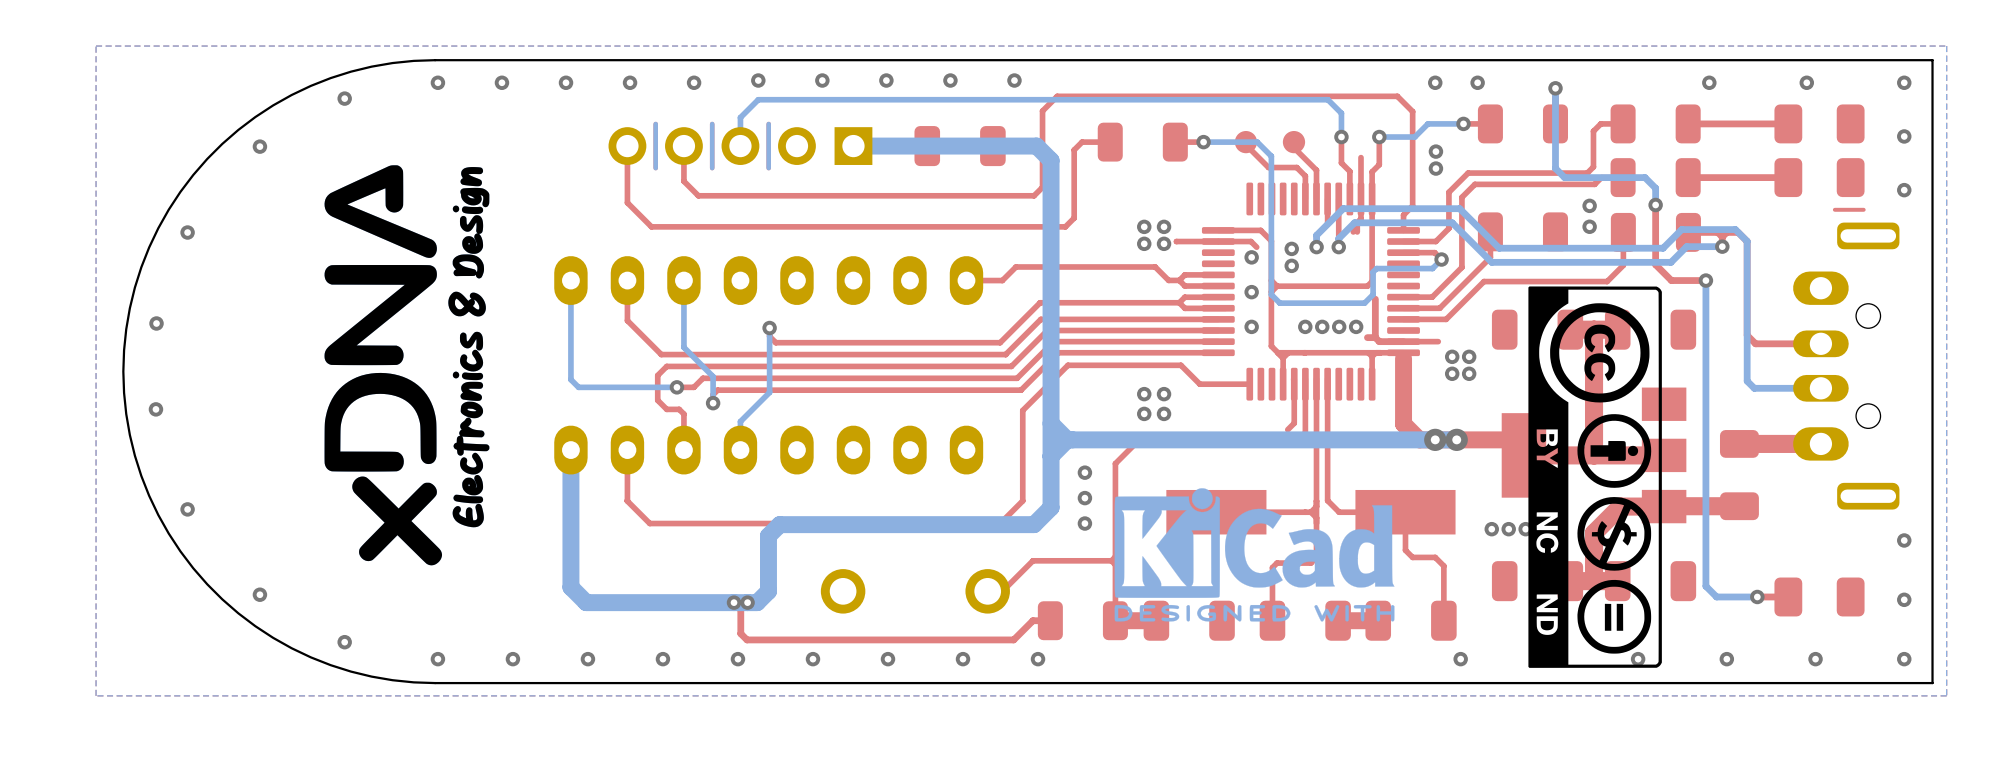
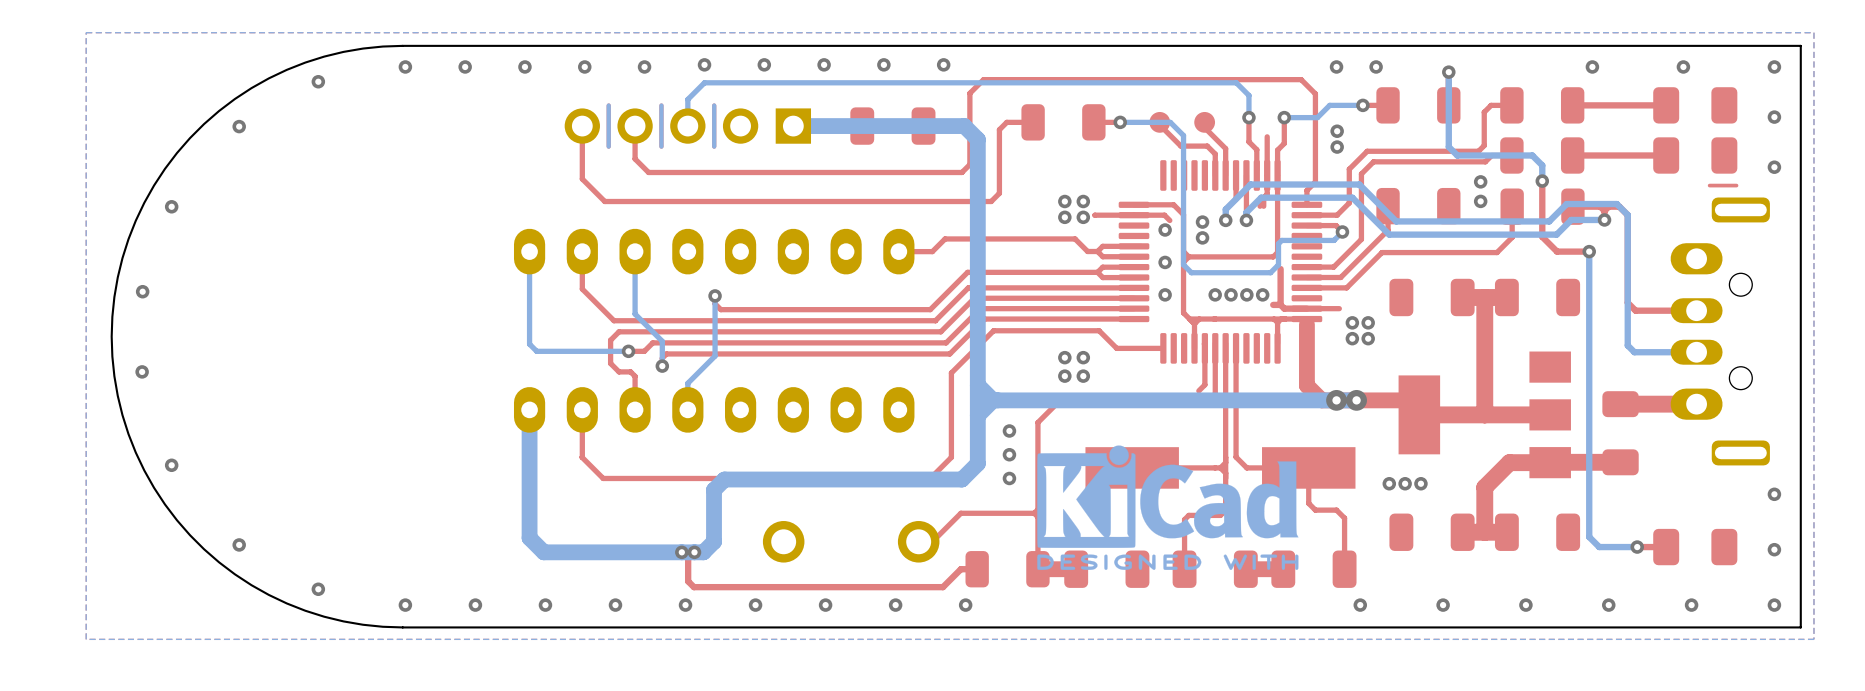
drawing: [324, 165, 490, 566] -> none
drawing: [1528, 286, 1662, 668] -> none

